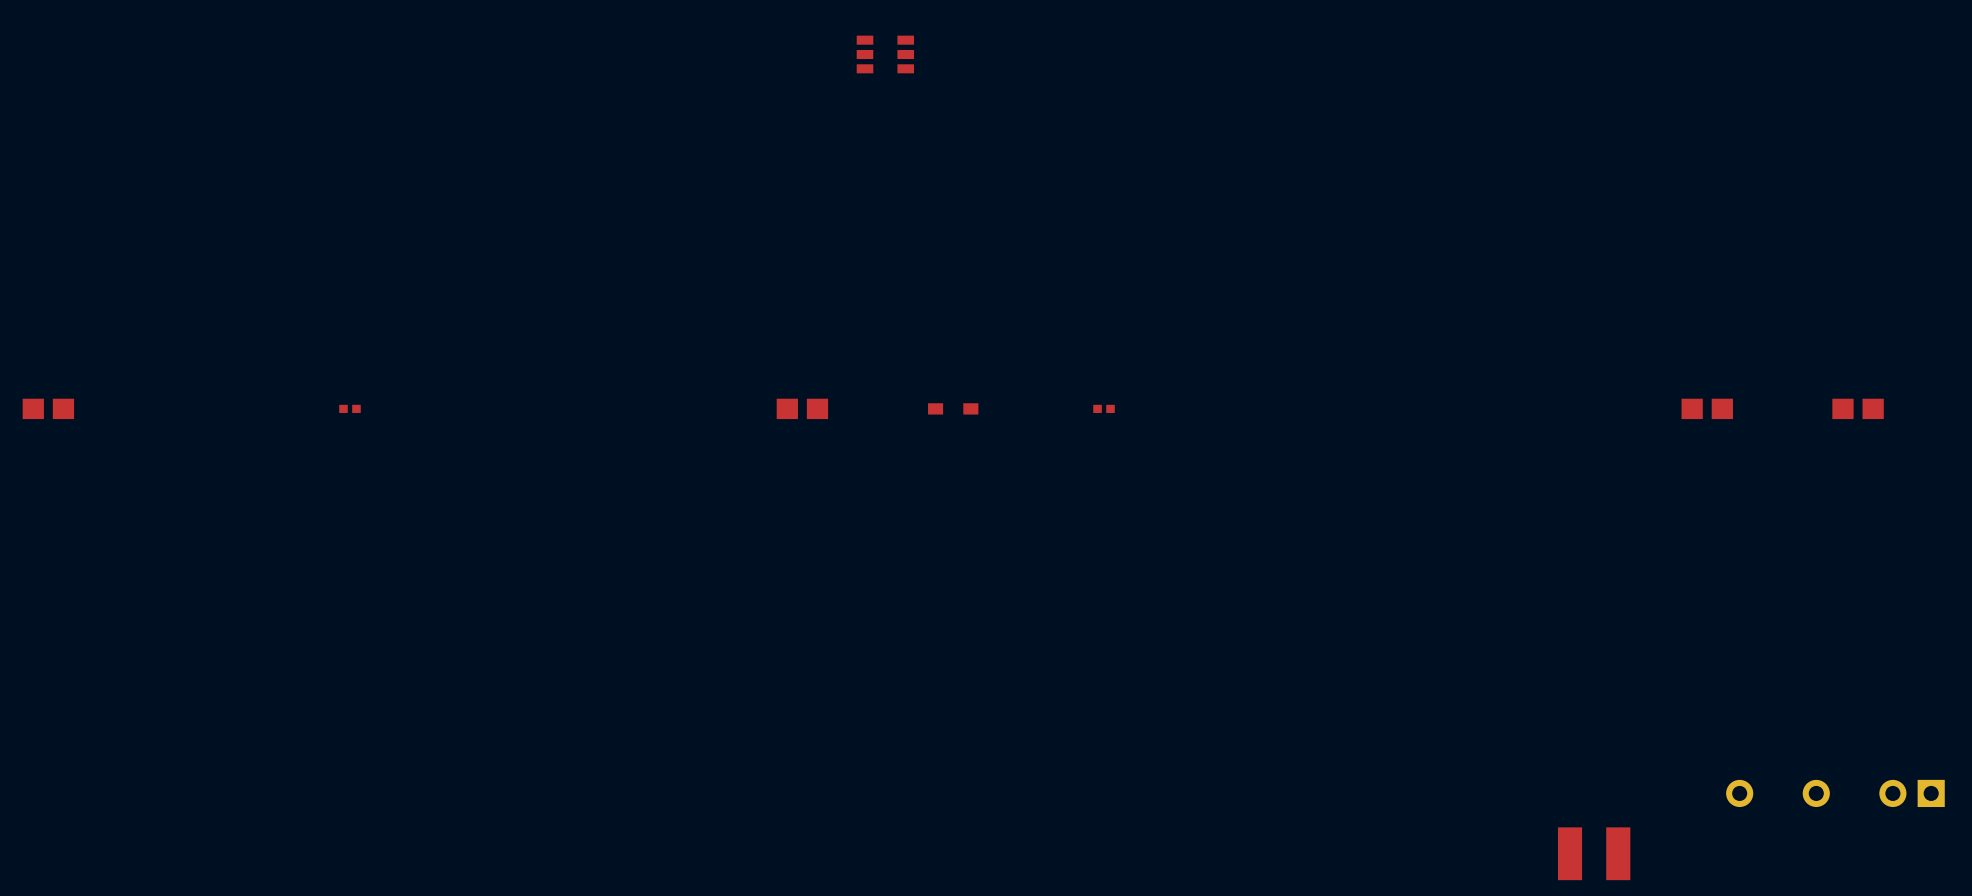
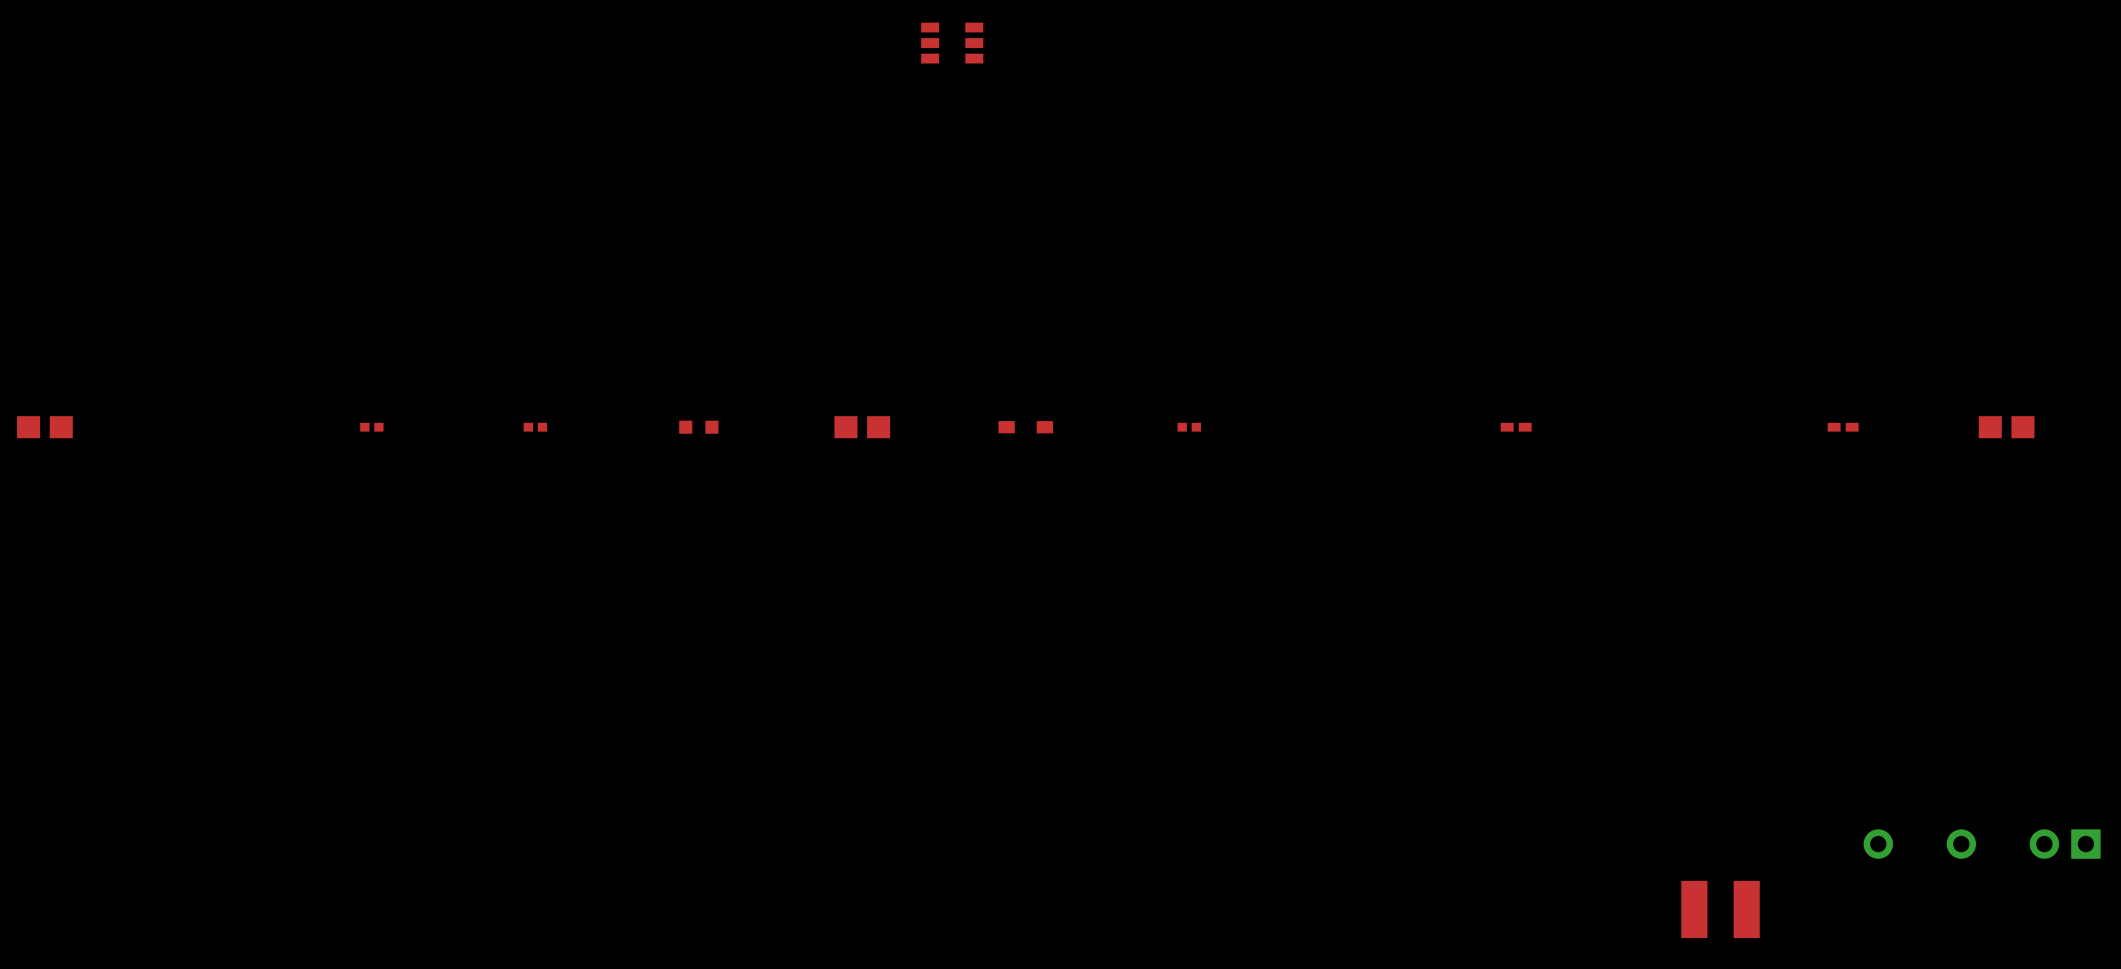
part footprint: [1681, 398, 1733, 420] -> [1827, 422, 1859, 432]
part: none -> (535, 427)
part: none -> (698, 427)
part: none -> (1516, 427)

